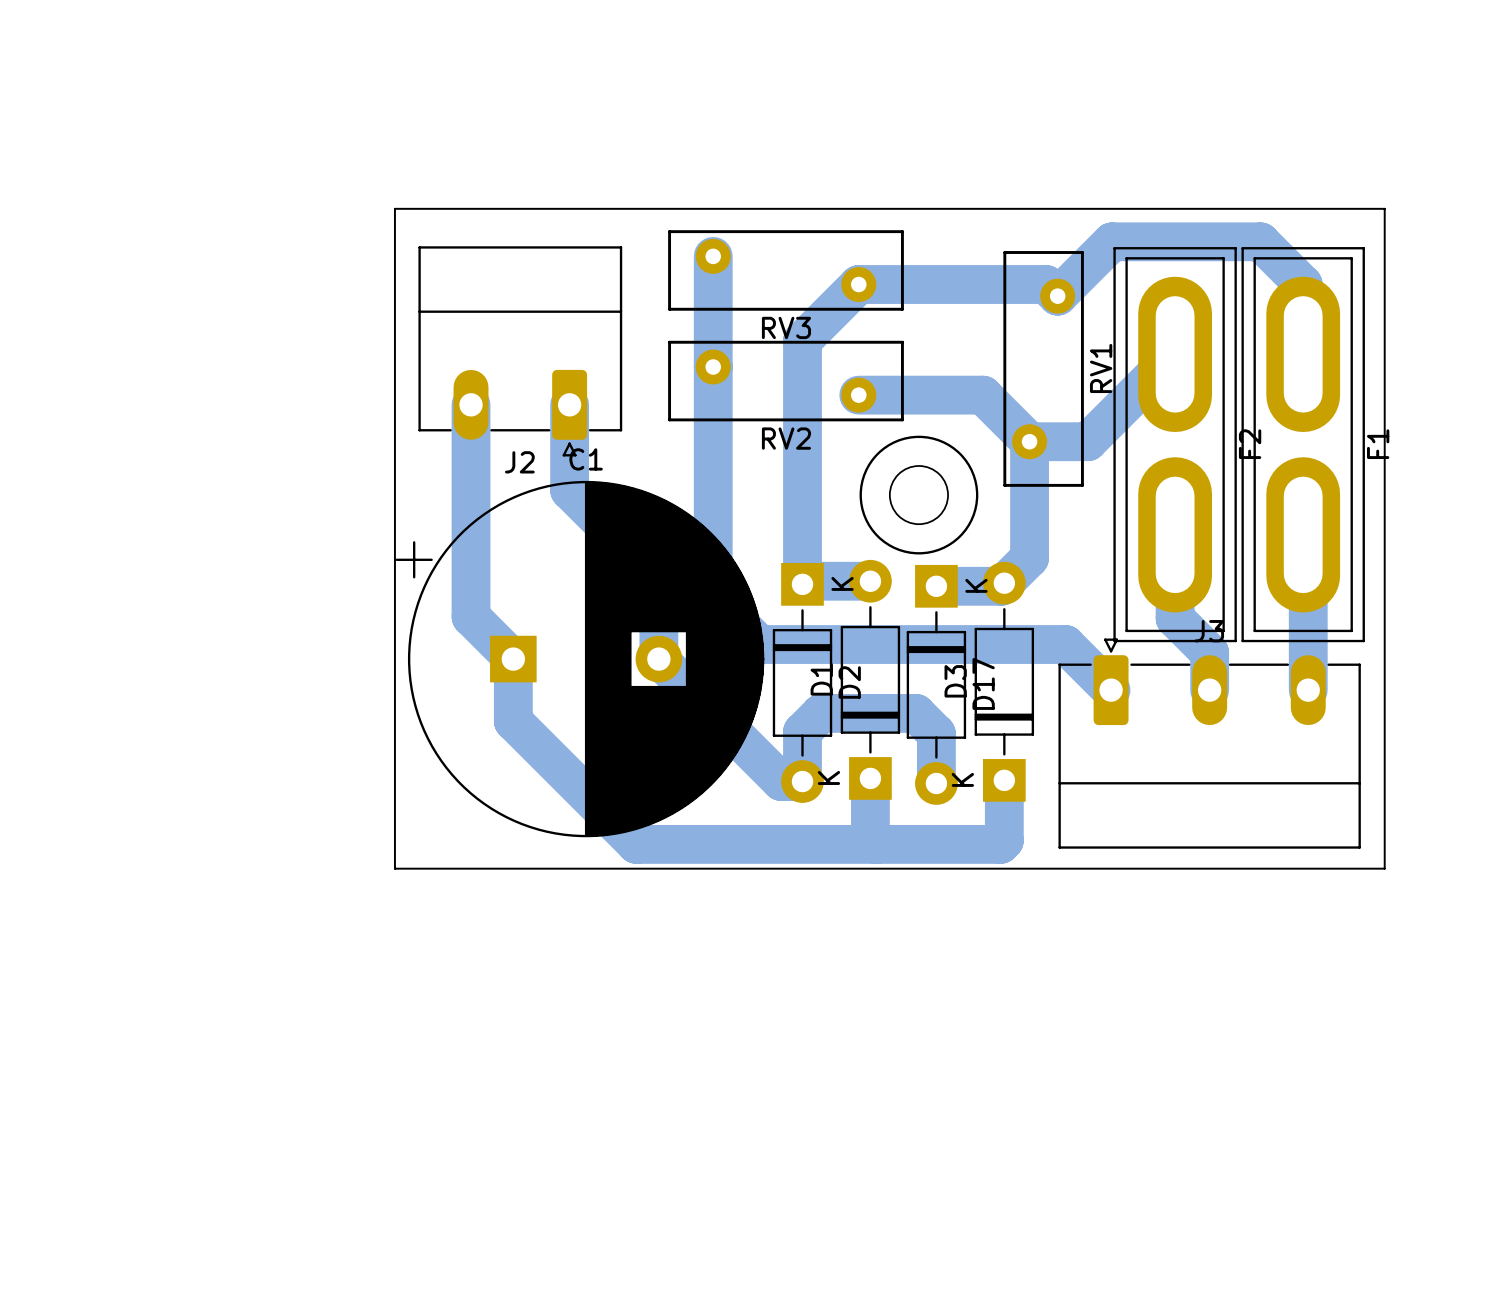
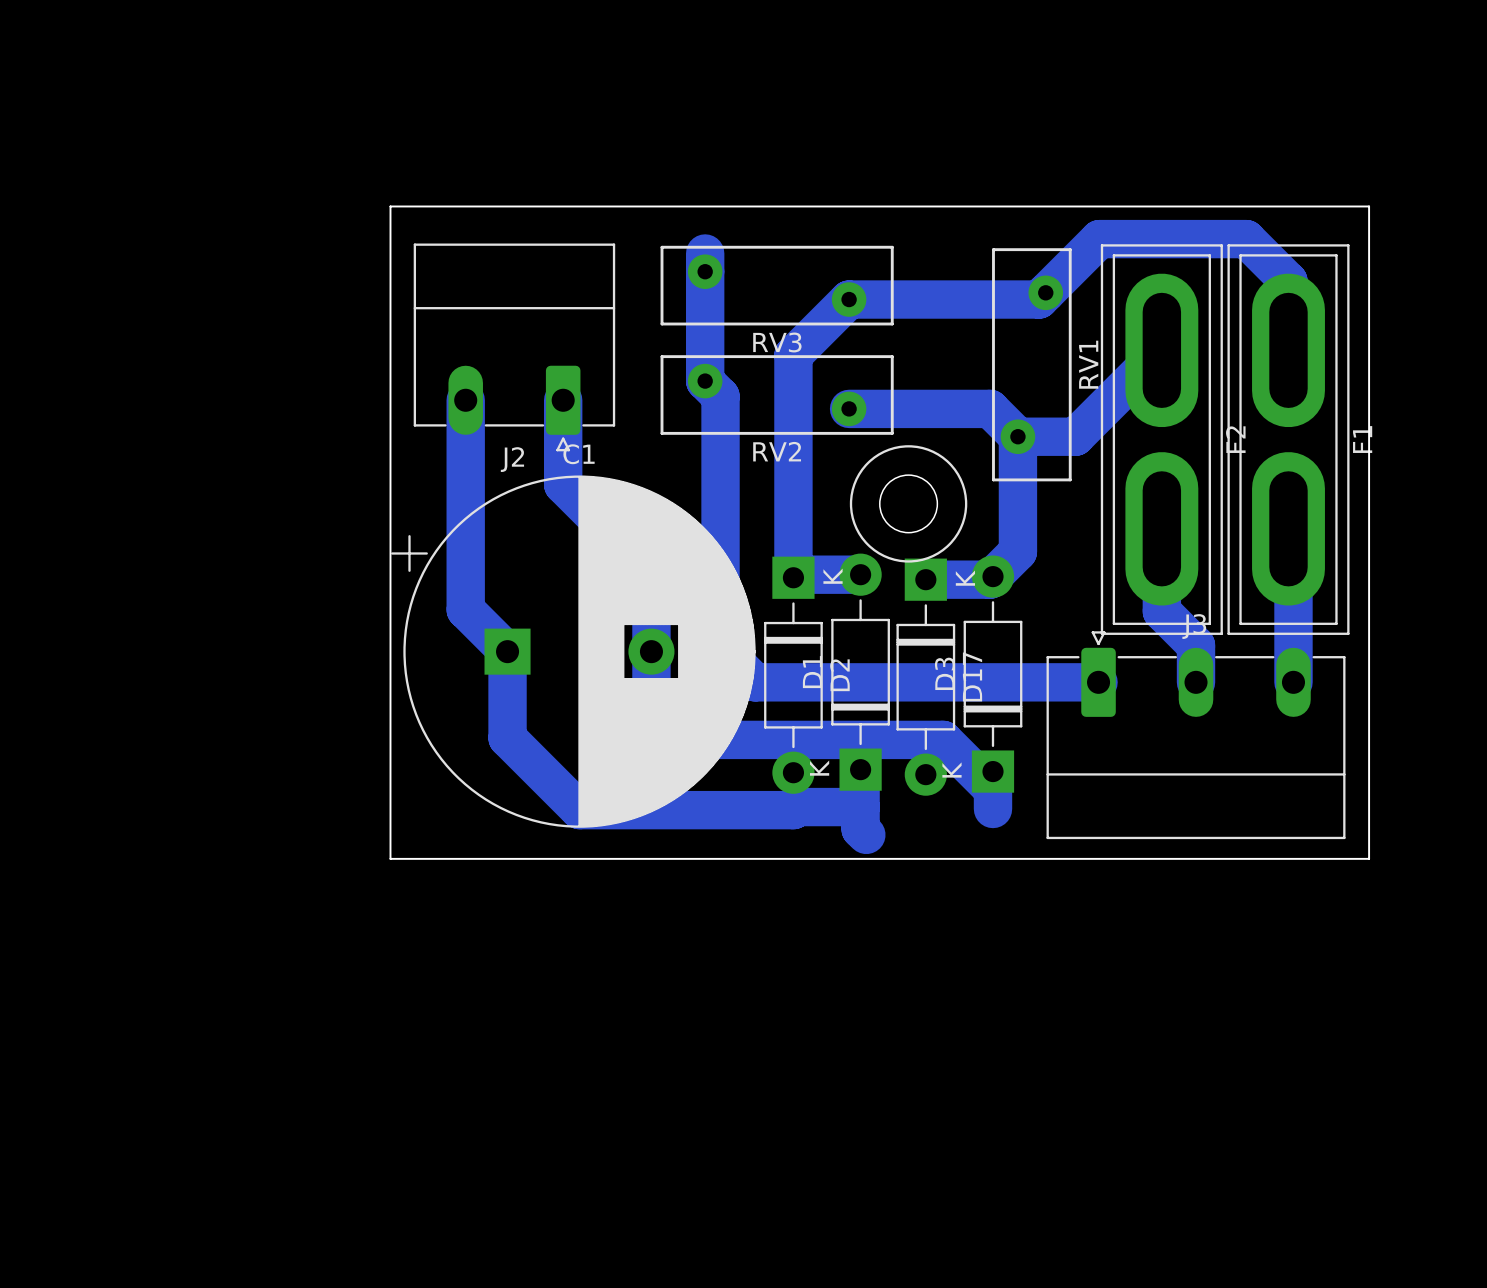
RV3 position: (786, 270) -> (777, 285)
bottom track: (1057, 296) (1046, 284) (858, 284) (802, 340) (802, 359) -> (1045, 292) (1039, 299) (849, 299) (793, 355)
RV2 position: (786, 381) -> (777, 395)
bottom track: (713, 385) (713, 597) (759, 644) (1065, 644) (1111, 690) -> (705, 381) (720, 396) (720, 647) (755, 682) (1098, 682)
bottom track: (858, 395) (982, 395) (1001, 413) -> (849, 408) (990, 408)
round board edge position: (918, 495) -> (908, 503)
drawing position: (918, 495) -> (908, 503)
bottom track: (658, 659) (781, 781) (802, 781) (802, 731) (820, 713) (916, 713) (936, 733) (936, 783) -> (651, 651) (651, 703) (687, 739) (943, 739) (993, 789)
bottom track: (513, 721) (636, 844) (1000, 844) (1004, 840) (1004, 818) -> (507, 713) (507, 737) (579, 810) (793, 810) (796, 807) (860, 807)

